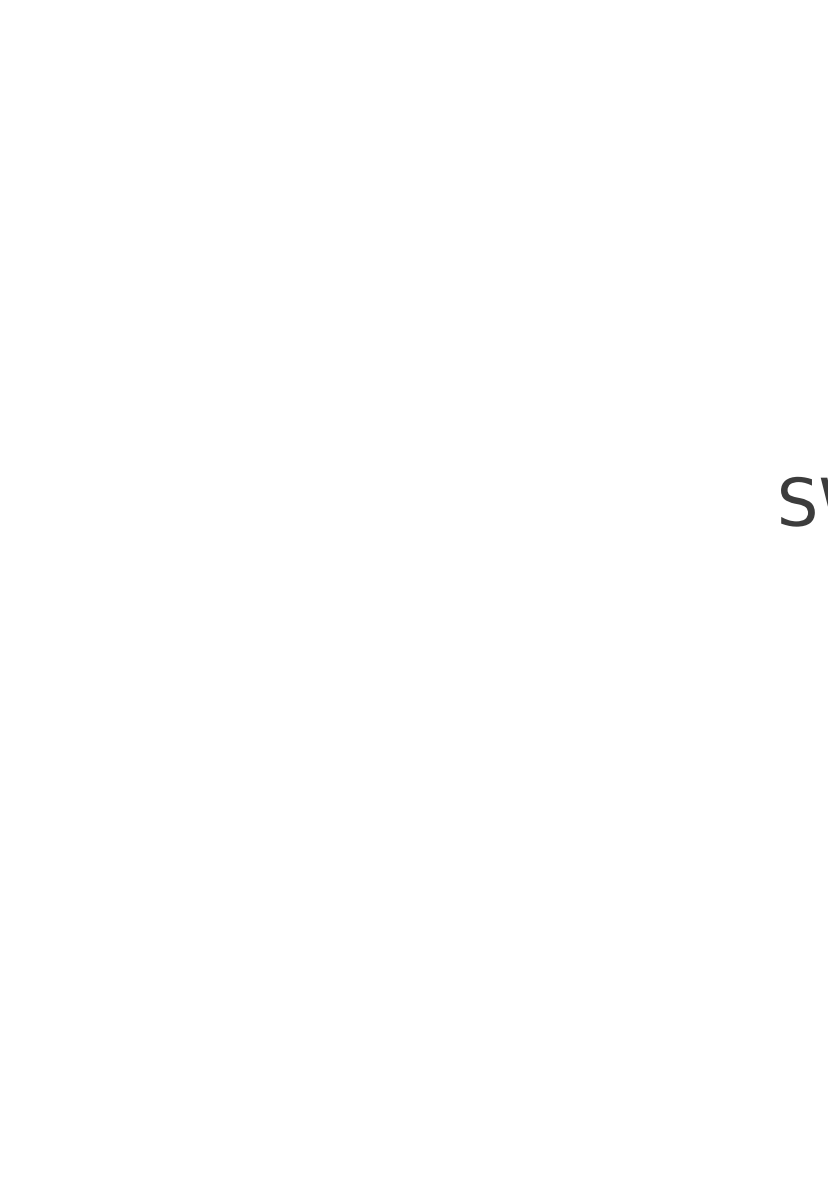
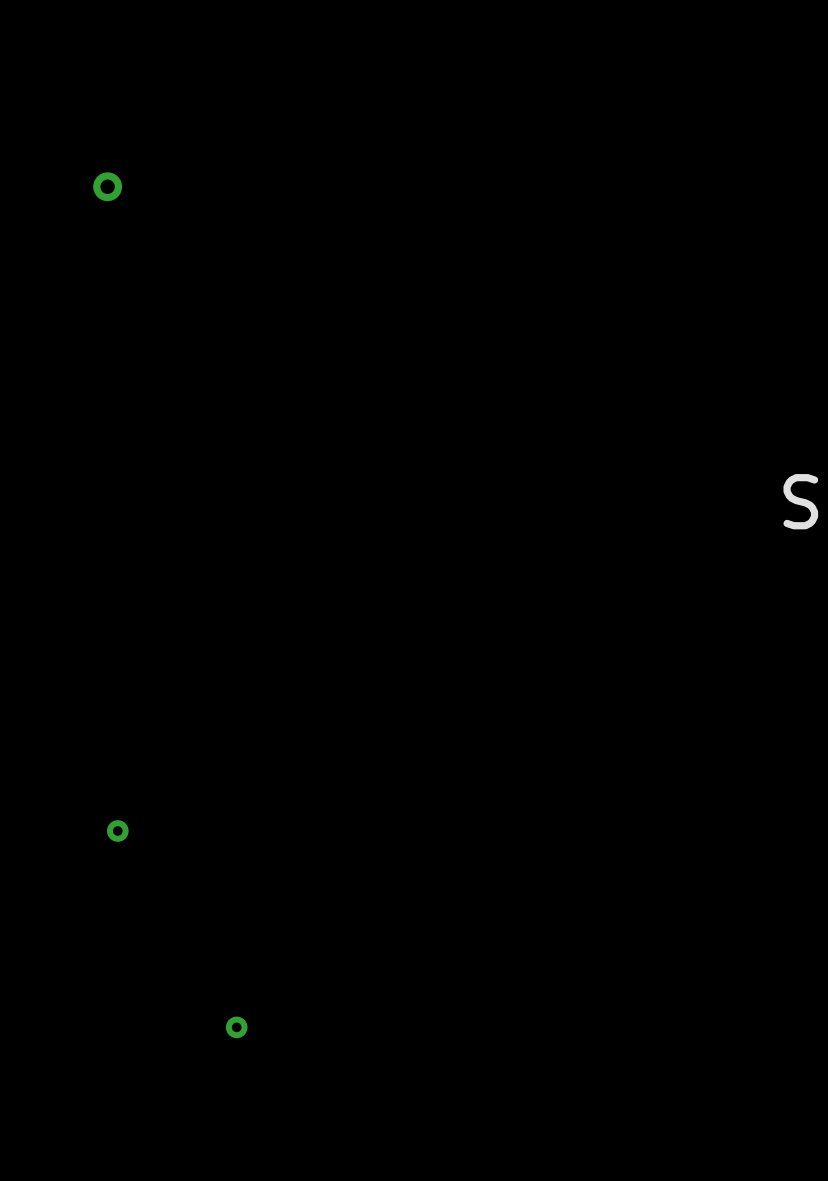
via: none -> (107, 186)
via: none -> (117, 830)
via: none -> (236, 1027)

